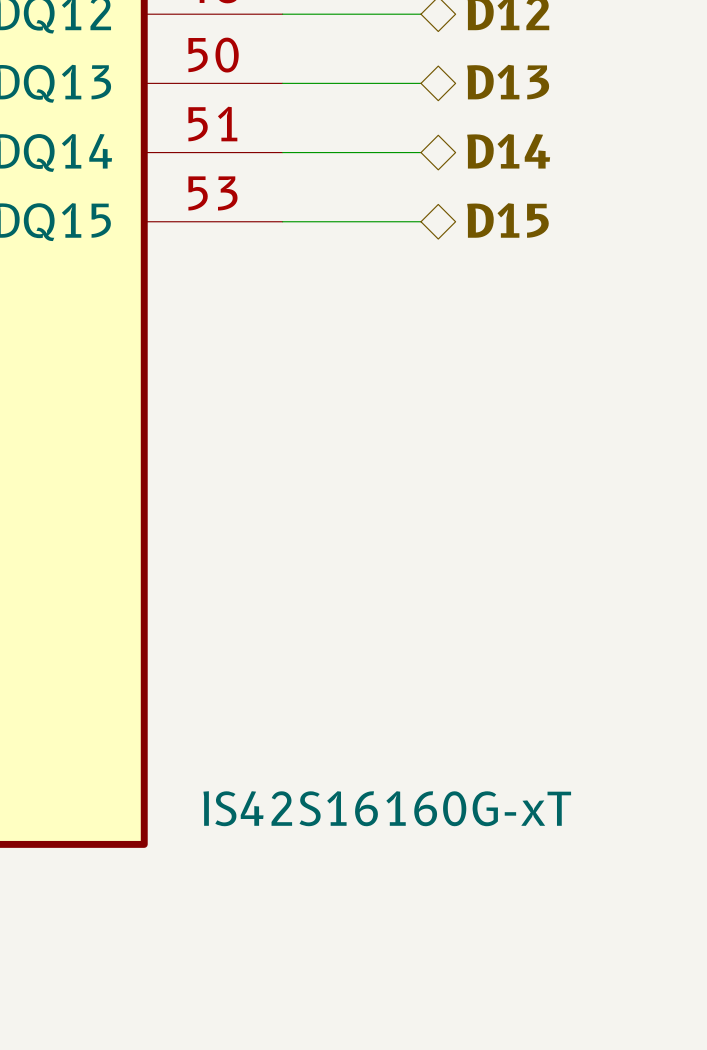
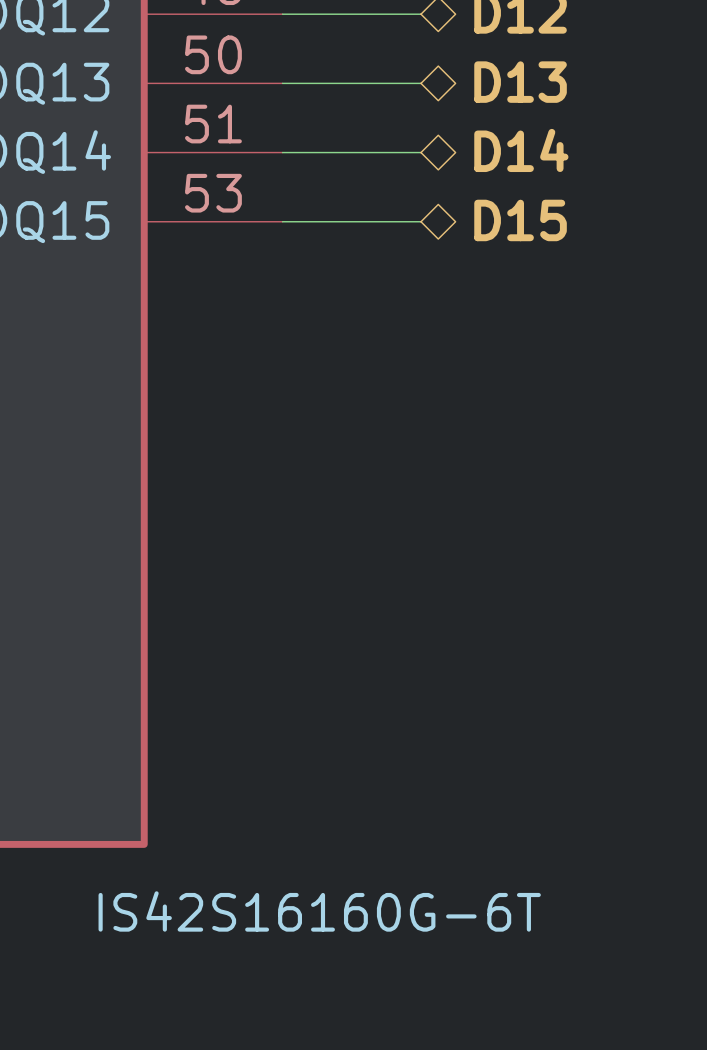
part value: IS42S16160G-xT (387, 808) -> IS42S16160G-6T (319, 911)

